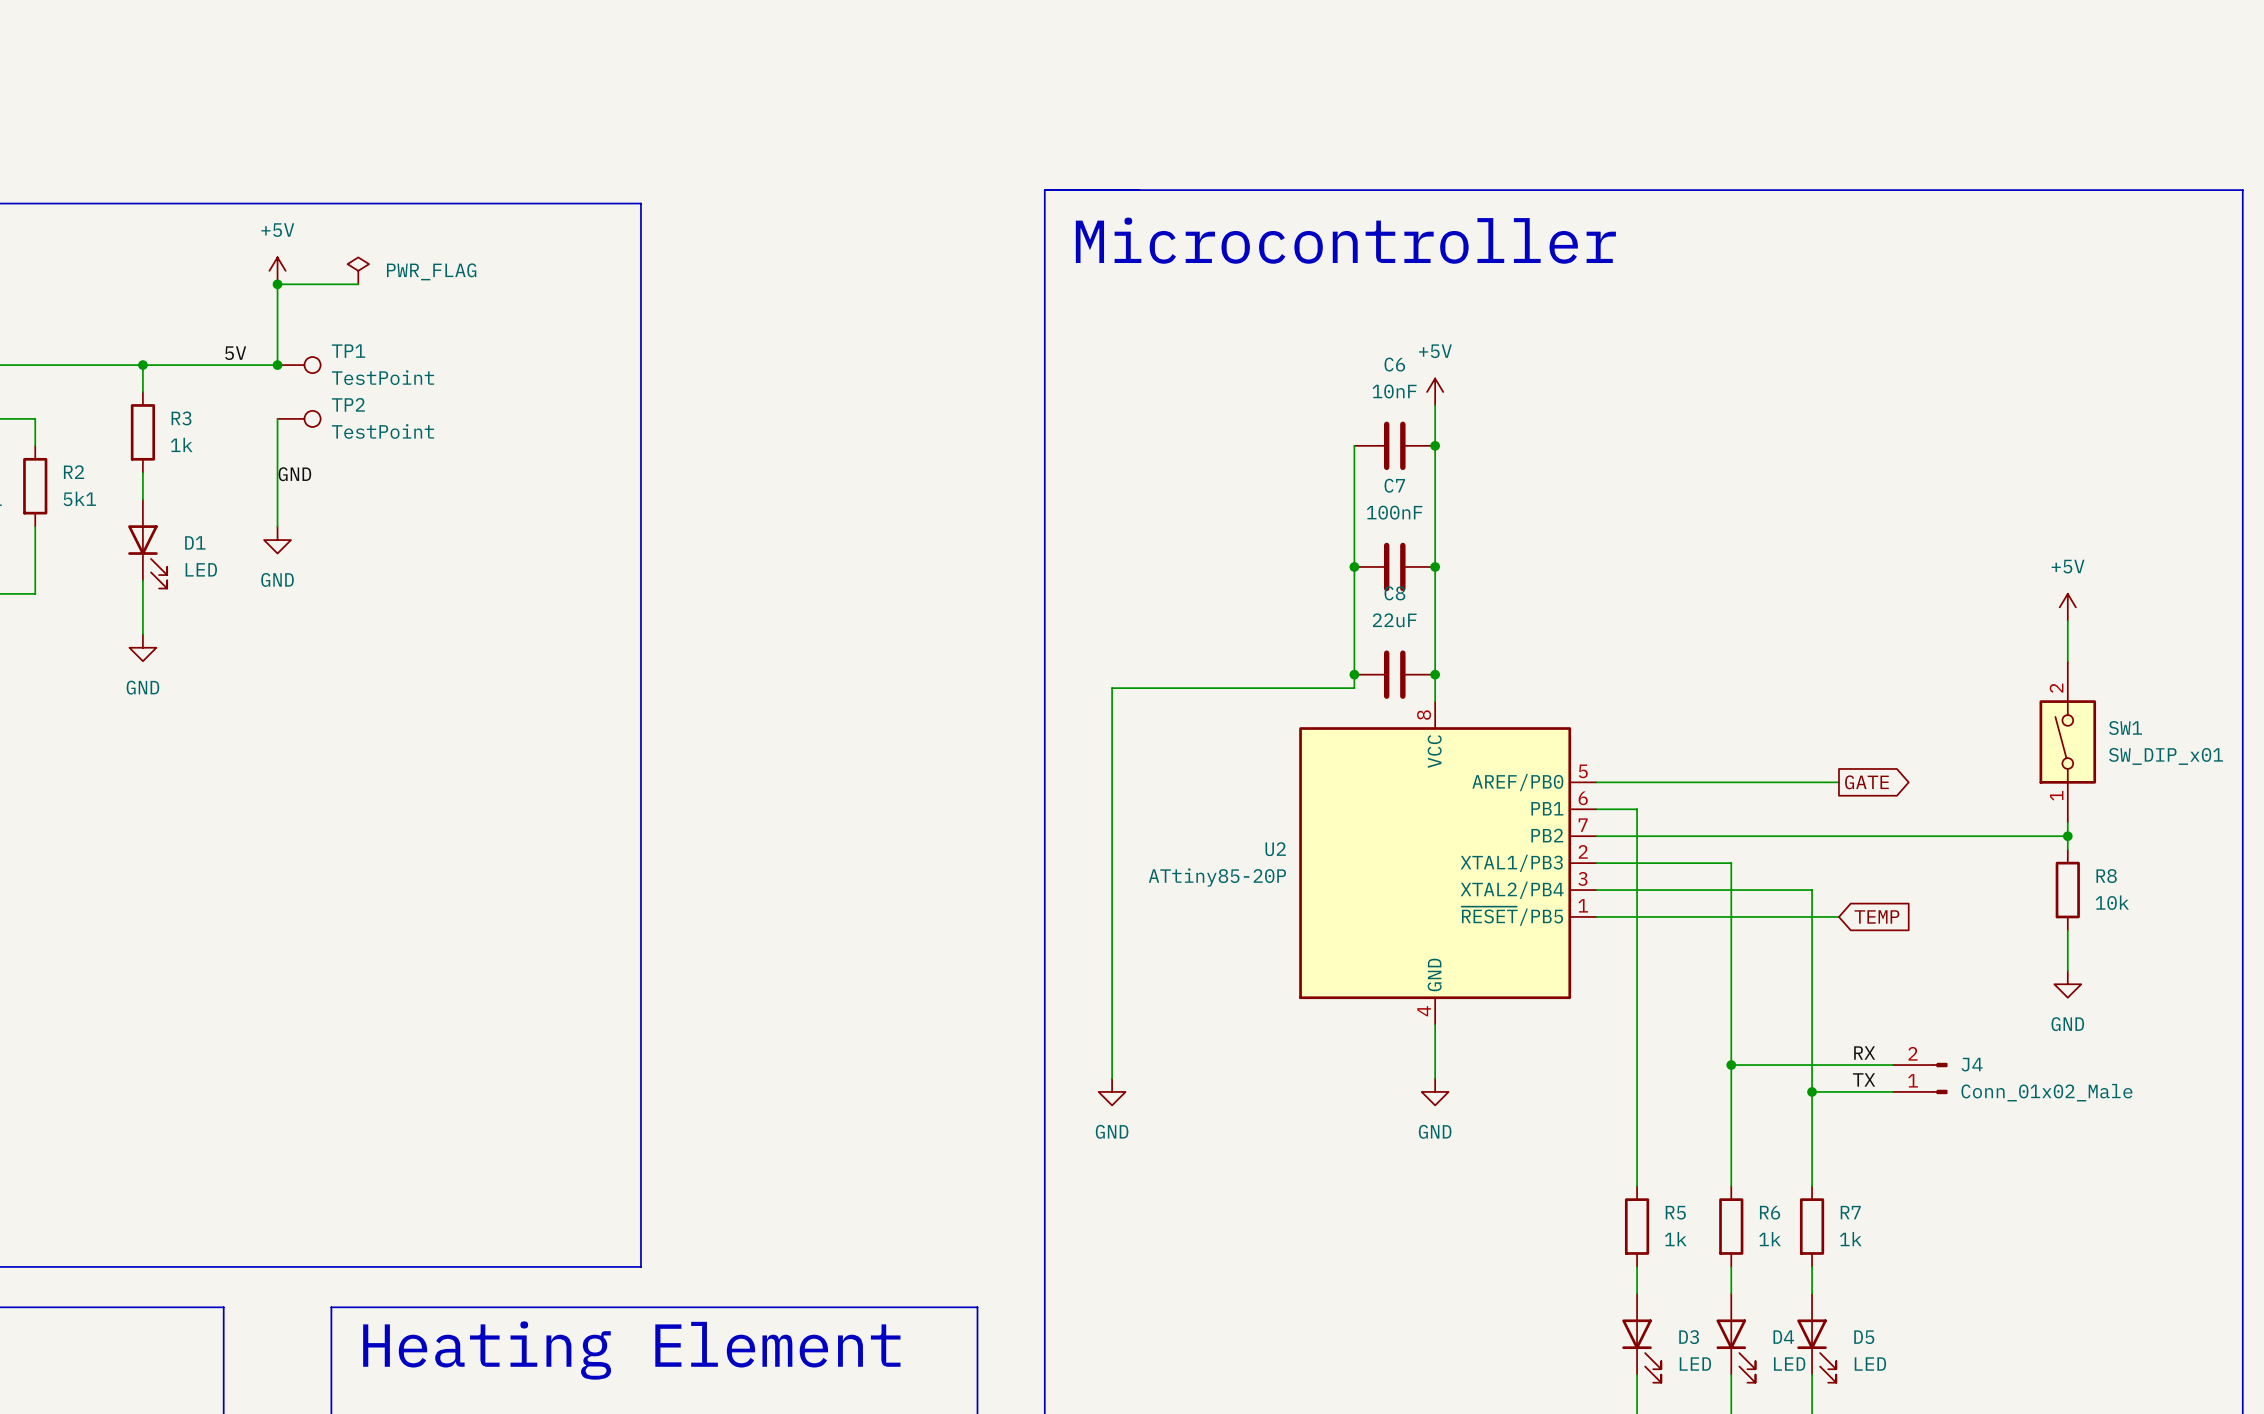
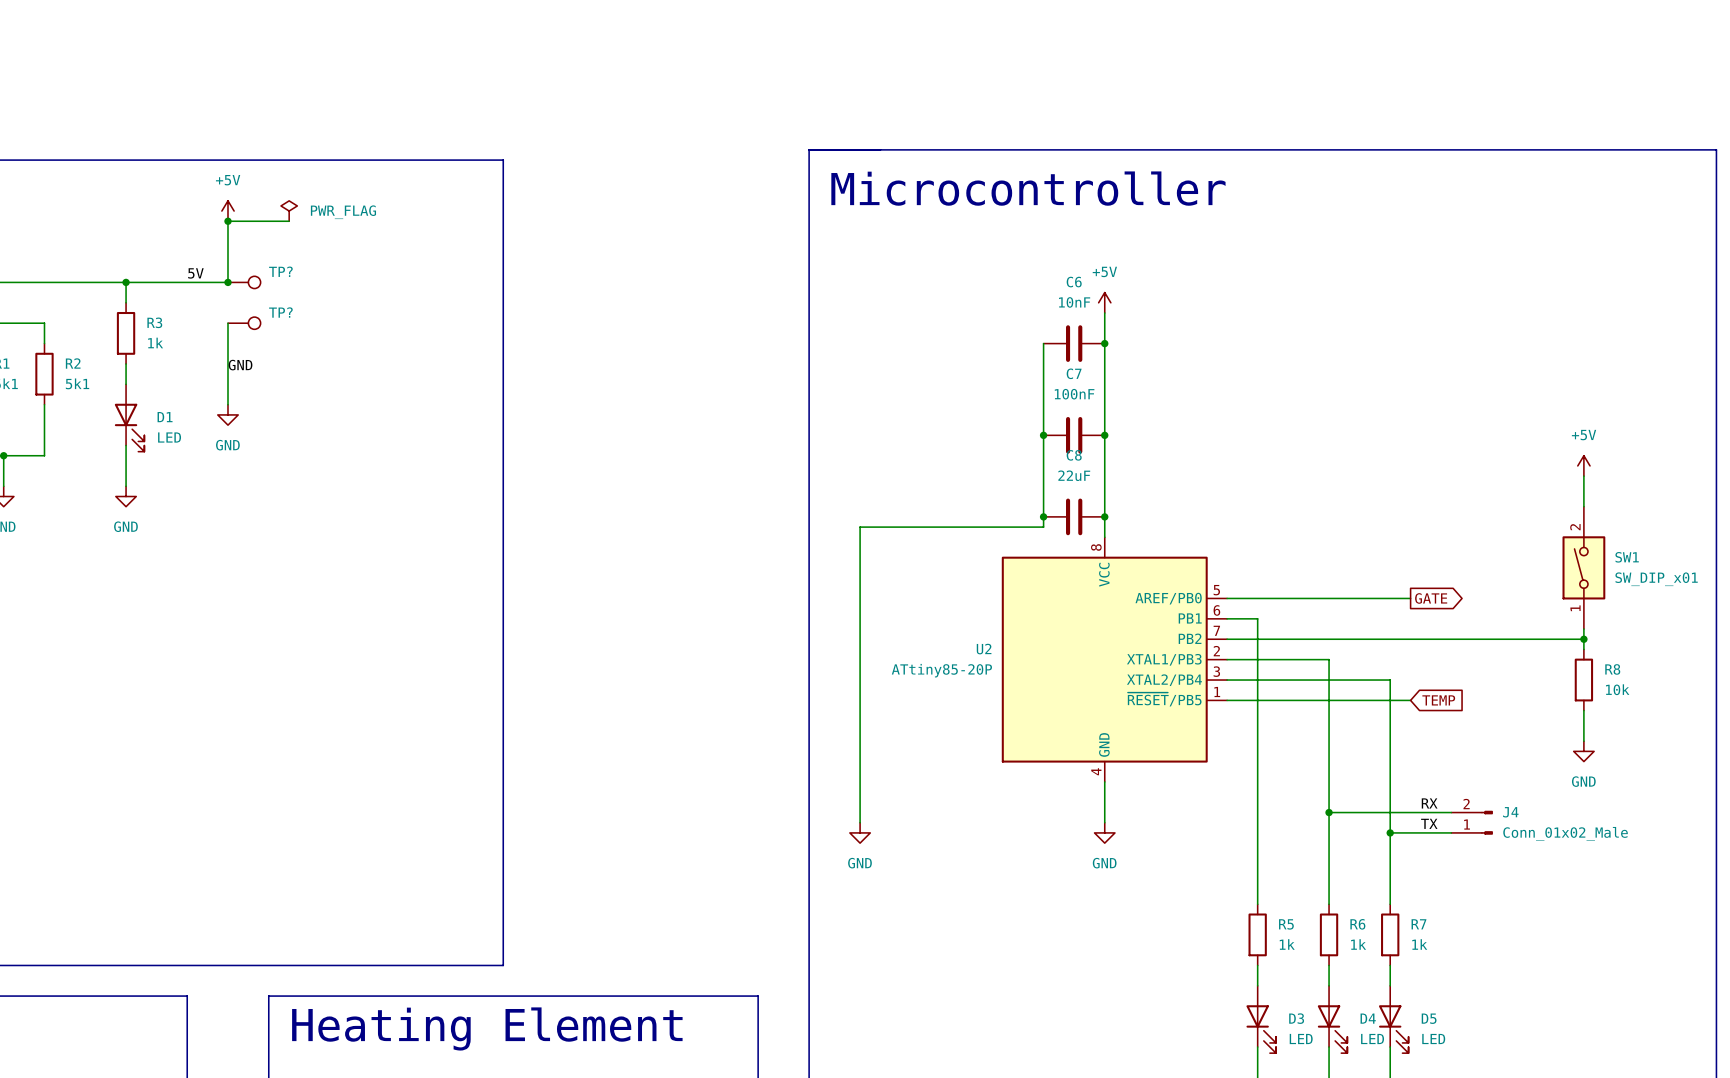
TP1 name: TP1 (348, 351) -> TP? (280, 271)
TP1 value: TestPoint (382, 377) -> none
TP2 name: TP2 (348, 404) -> TP? (280, 312)
TP2 value: TestPoint (382, 431) -> none

